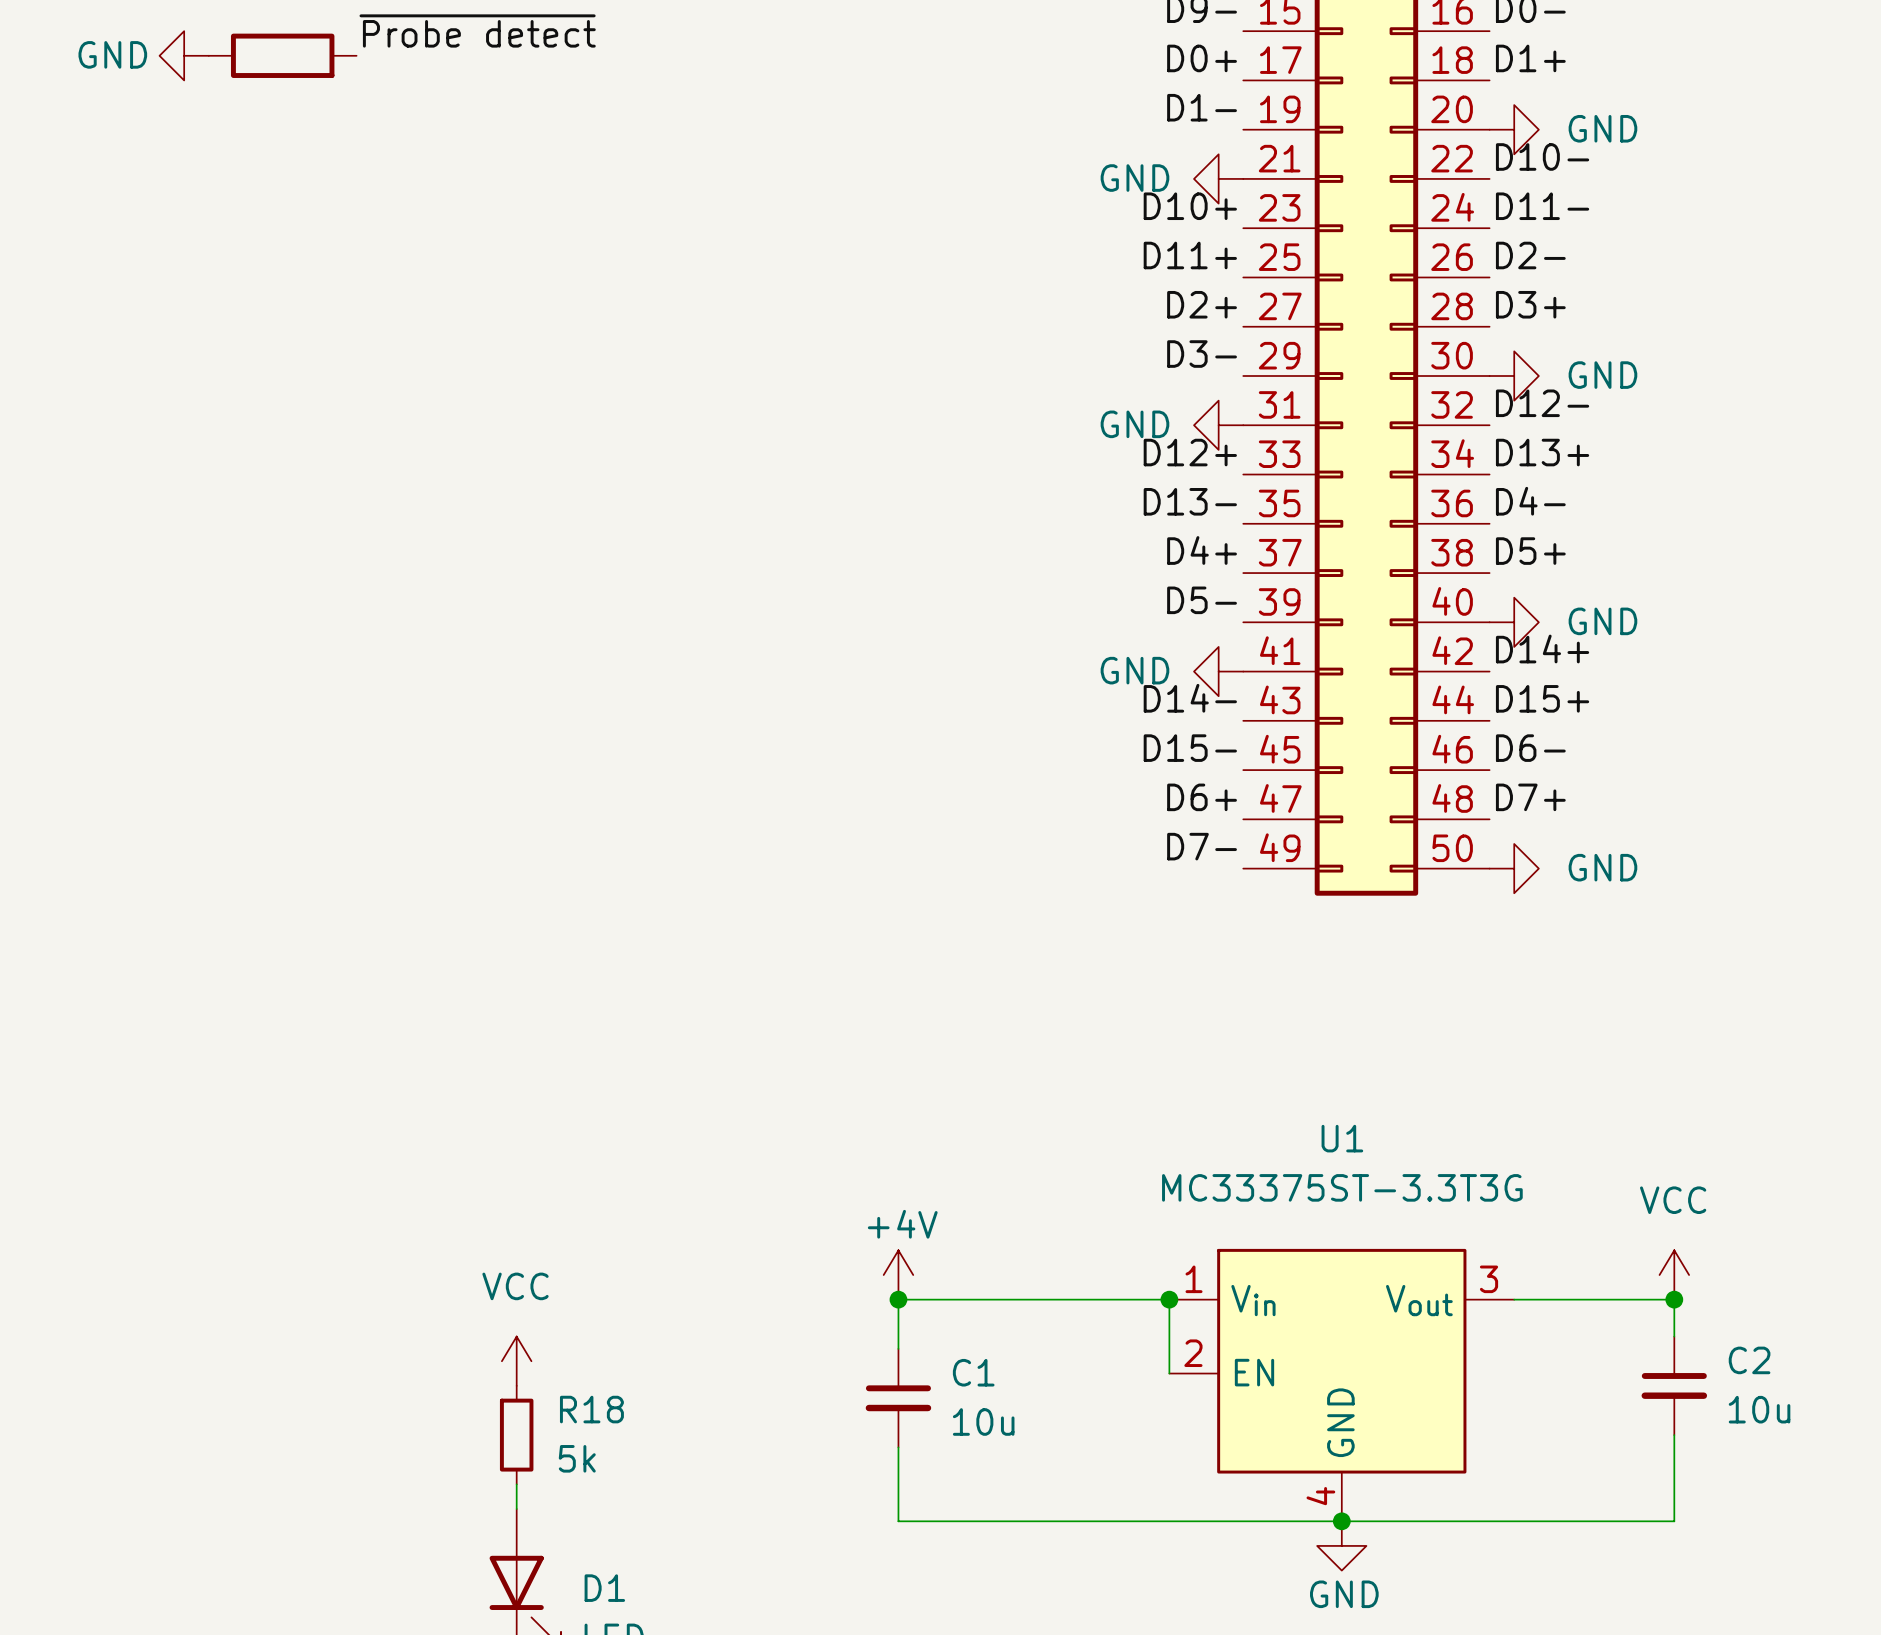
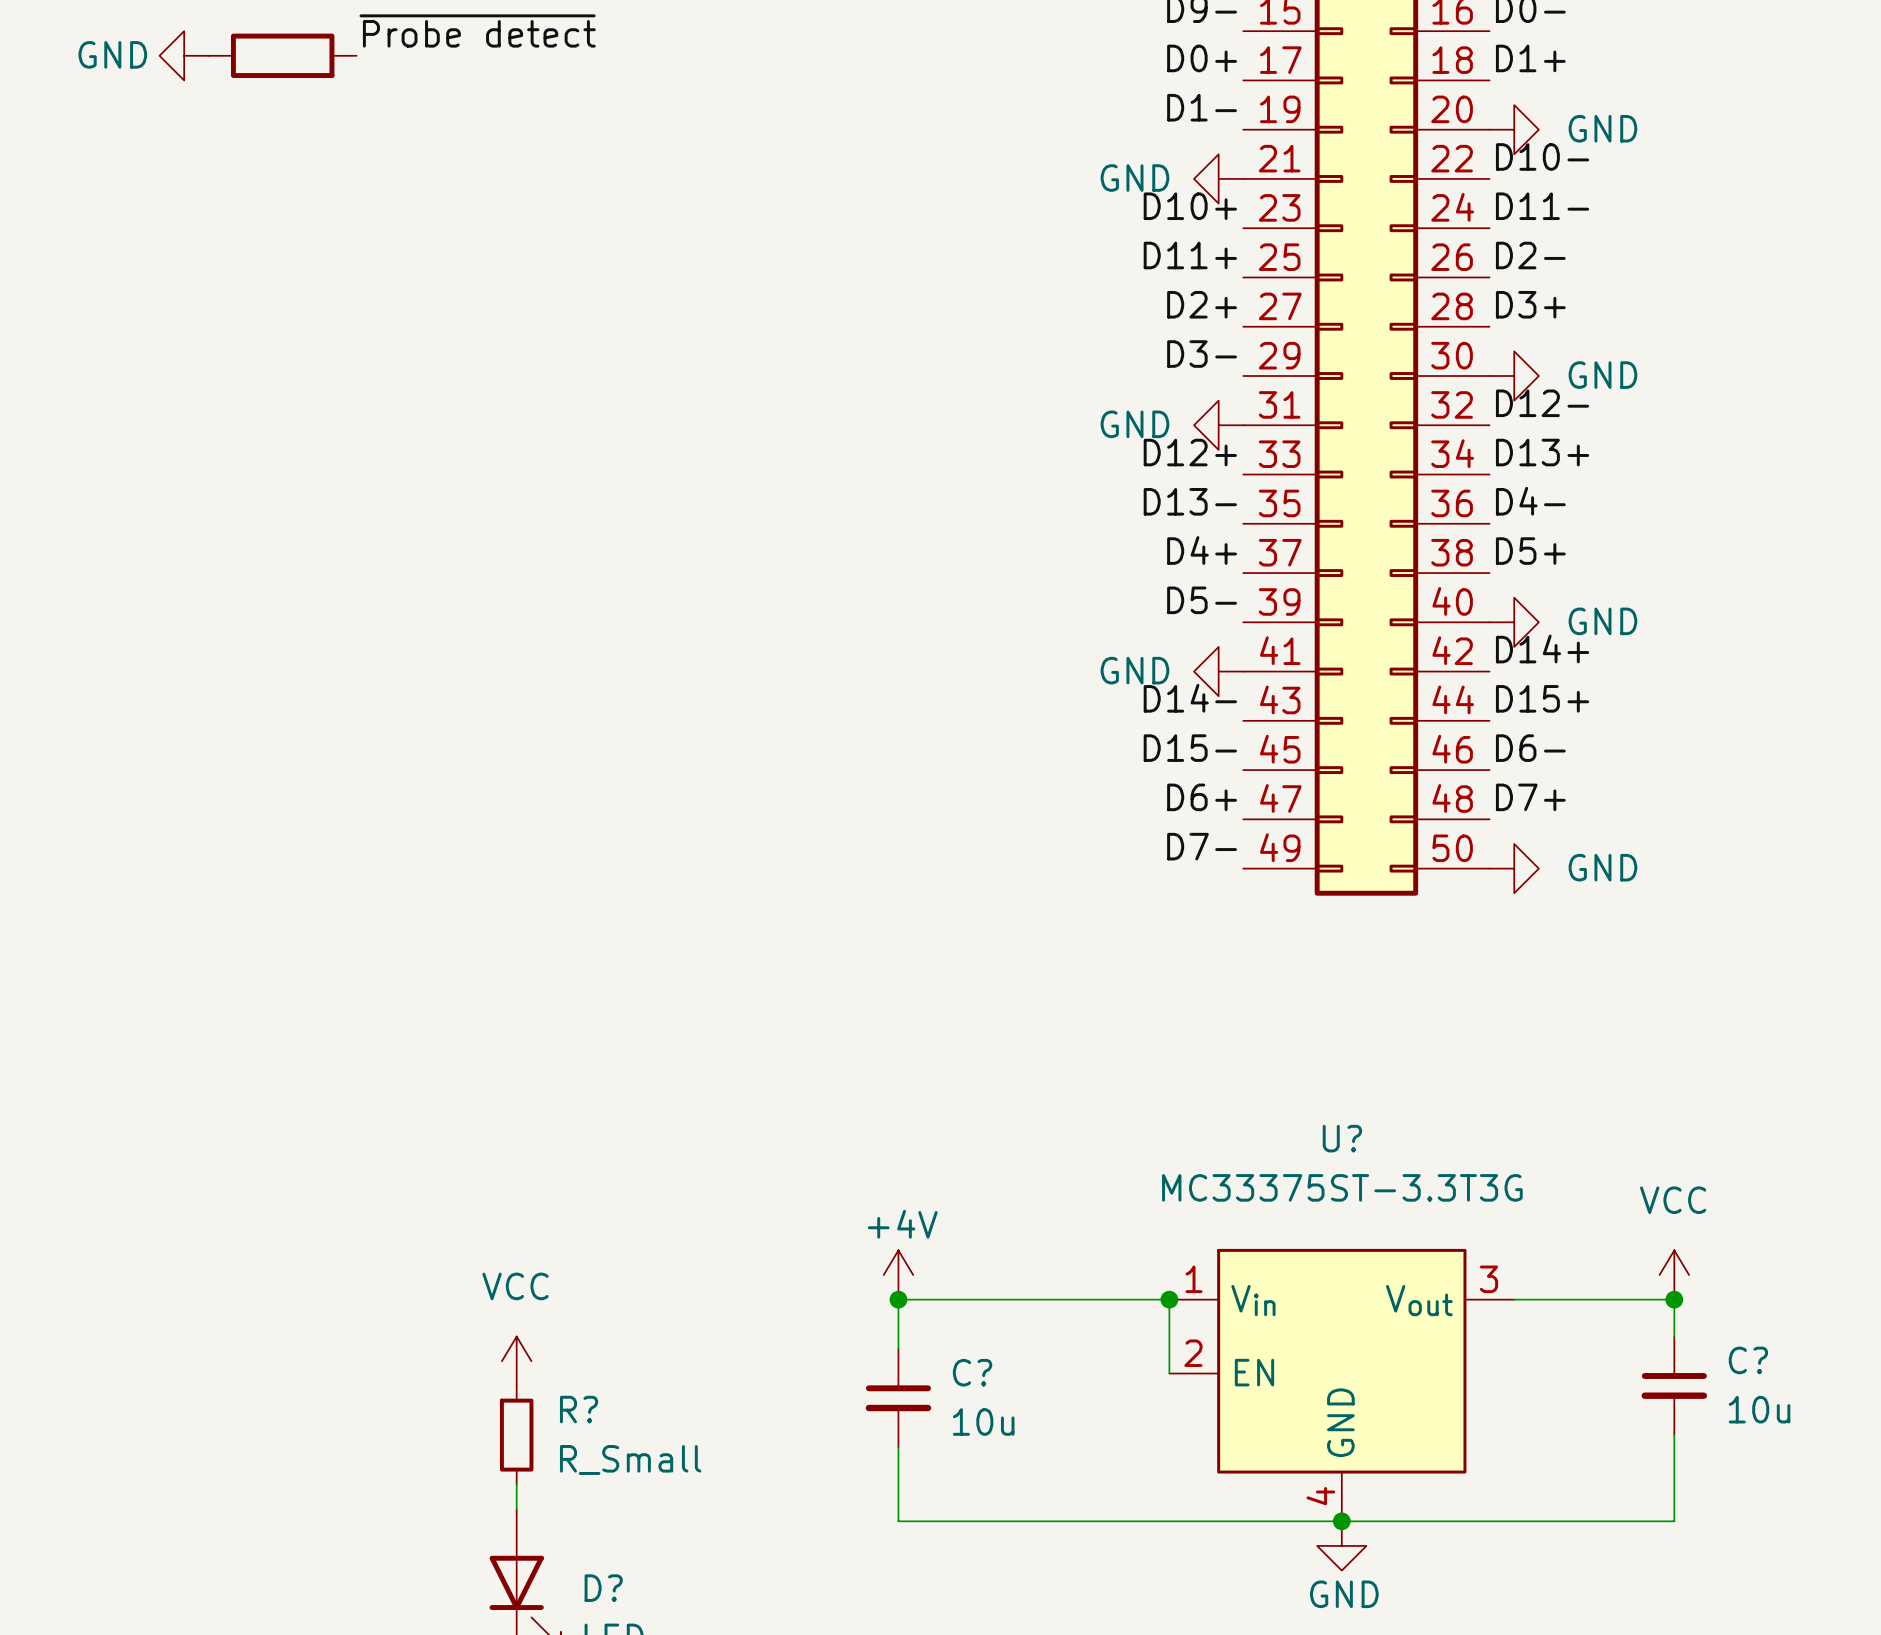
U1 name: U1 (1342, 1138) -> U? (1342, 1138)
C2 name: C2 (1749, 1360) -> C? (1748, 1360)
C1 name: C1 (973, 1372) -> C? (972, 1372)
R18 name: R18 (591, 1409) -> R? (579, 1409)
R18 value: 5k (577, 1458) -> R_Small (630, 1459)
D1 name: D1 (604, 1588) -> D? (603, 1588)

